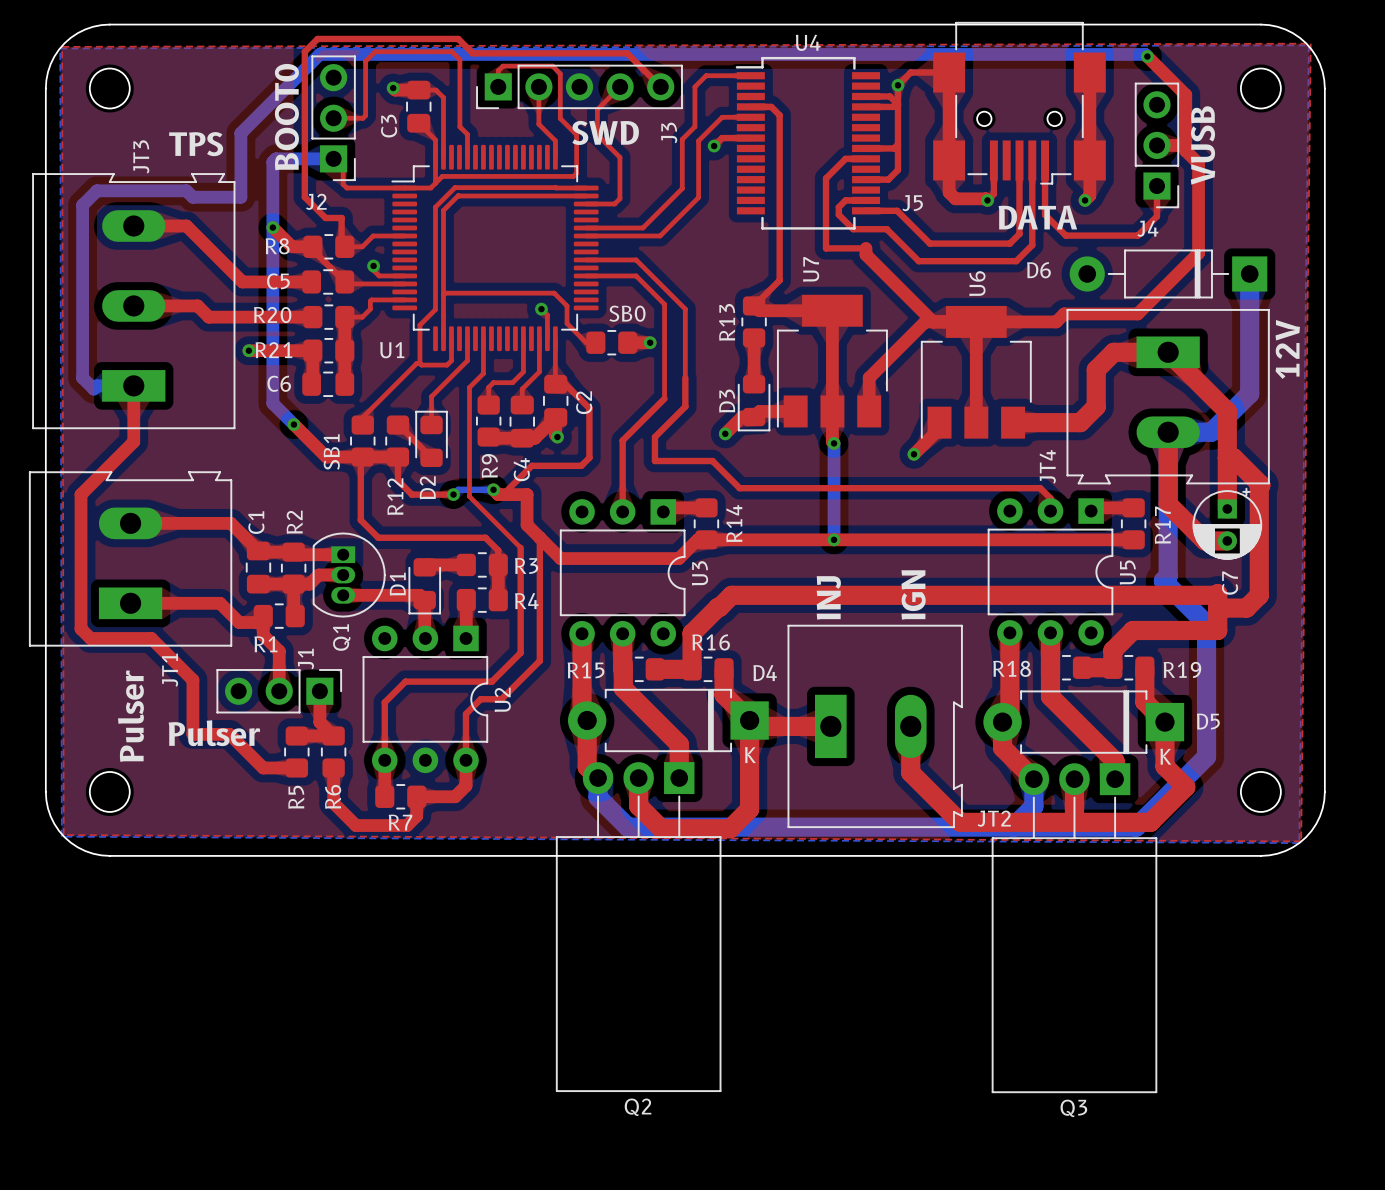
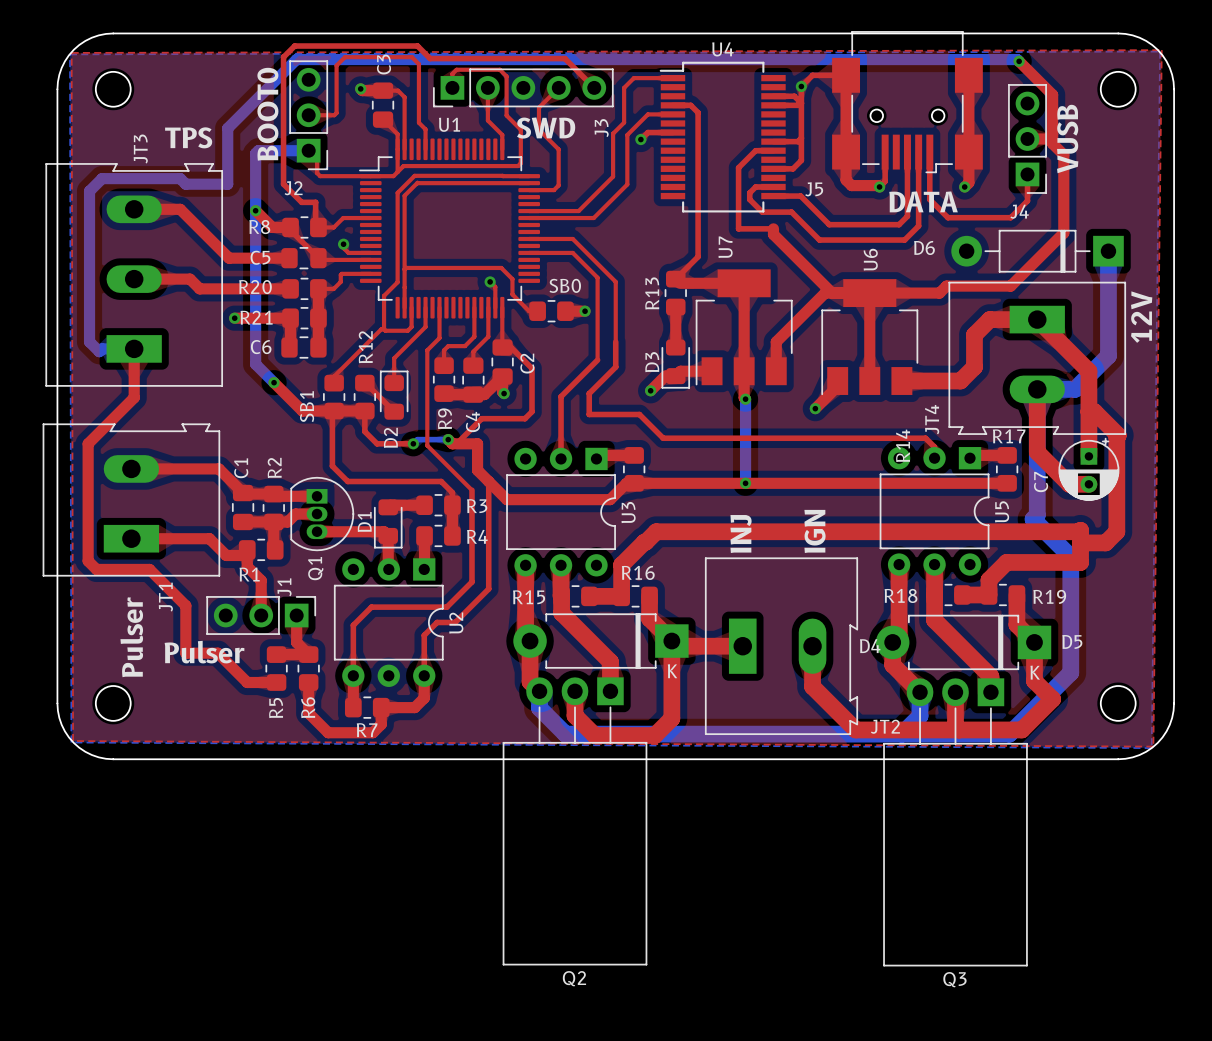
C3 name position: C3 (389, 126) -> C3 (383, 64)
U1 name position: U1 (392, 350) -> U1 (449, 124)
R12 name position: R12 (395, 496) -> R12 (365, 347)
R14 name position: R14 (734, 523) -> R14 (903, 445)
R17 name rotation: 0° (1162, 525) -> 90° clockwise (1009, 436)
C7 name position: C7 (1230, 583) -> C7 (1041, 482)
D4 name position: D4 (765, 673) -> D4 (870, 646)

